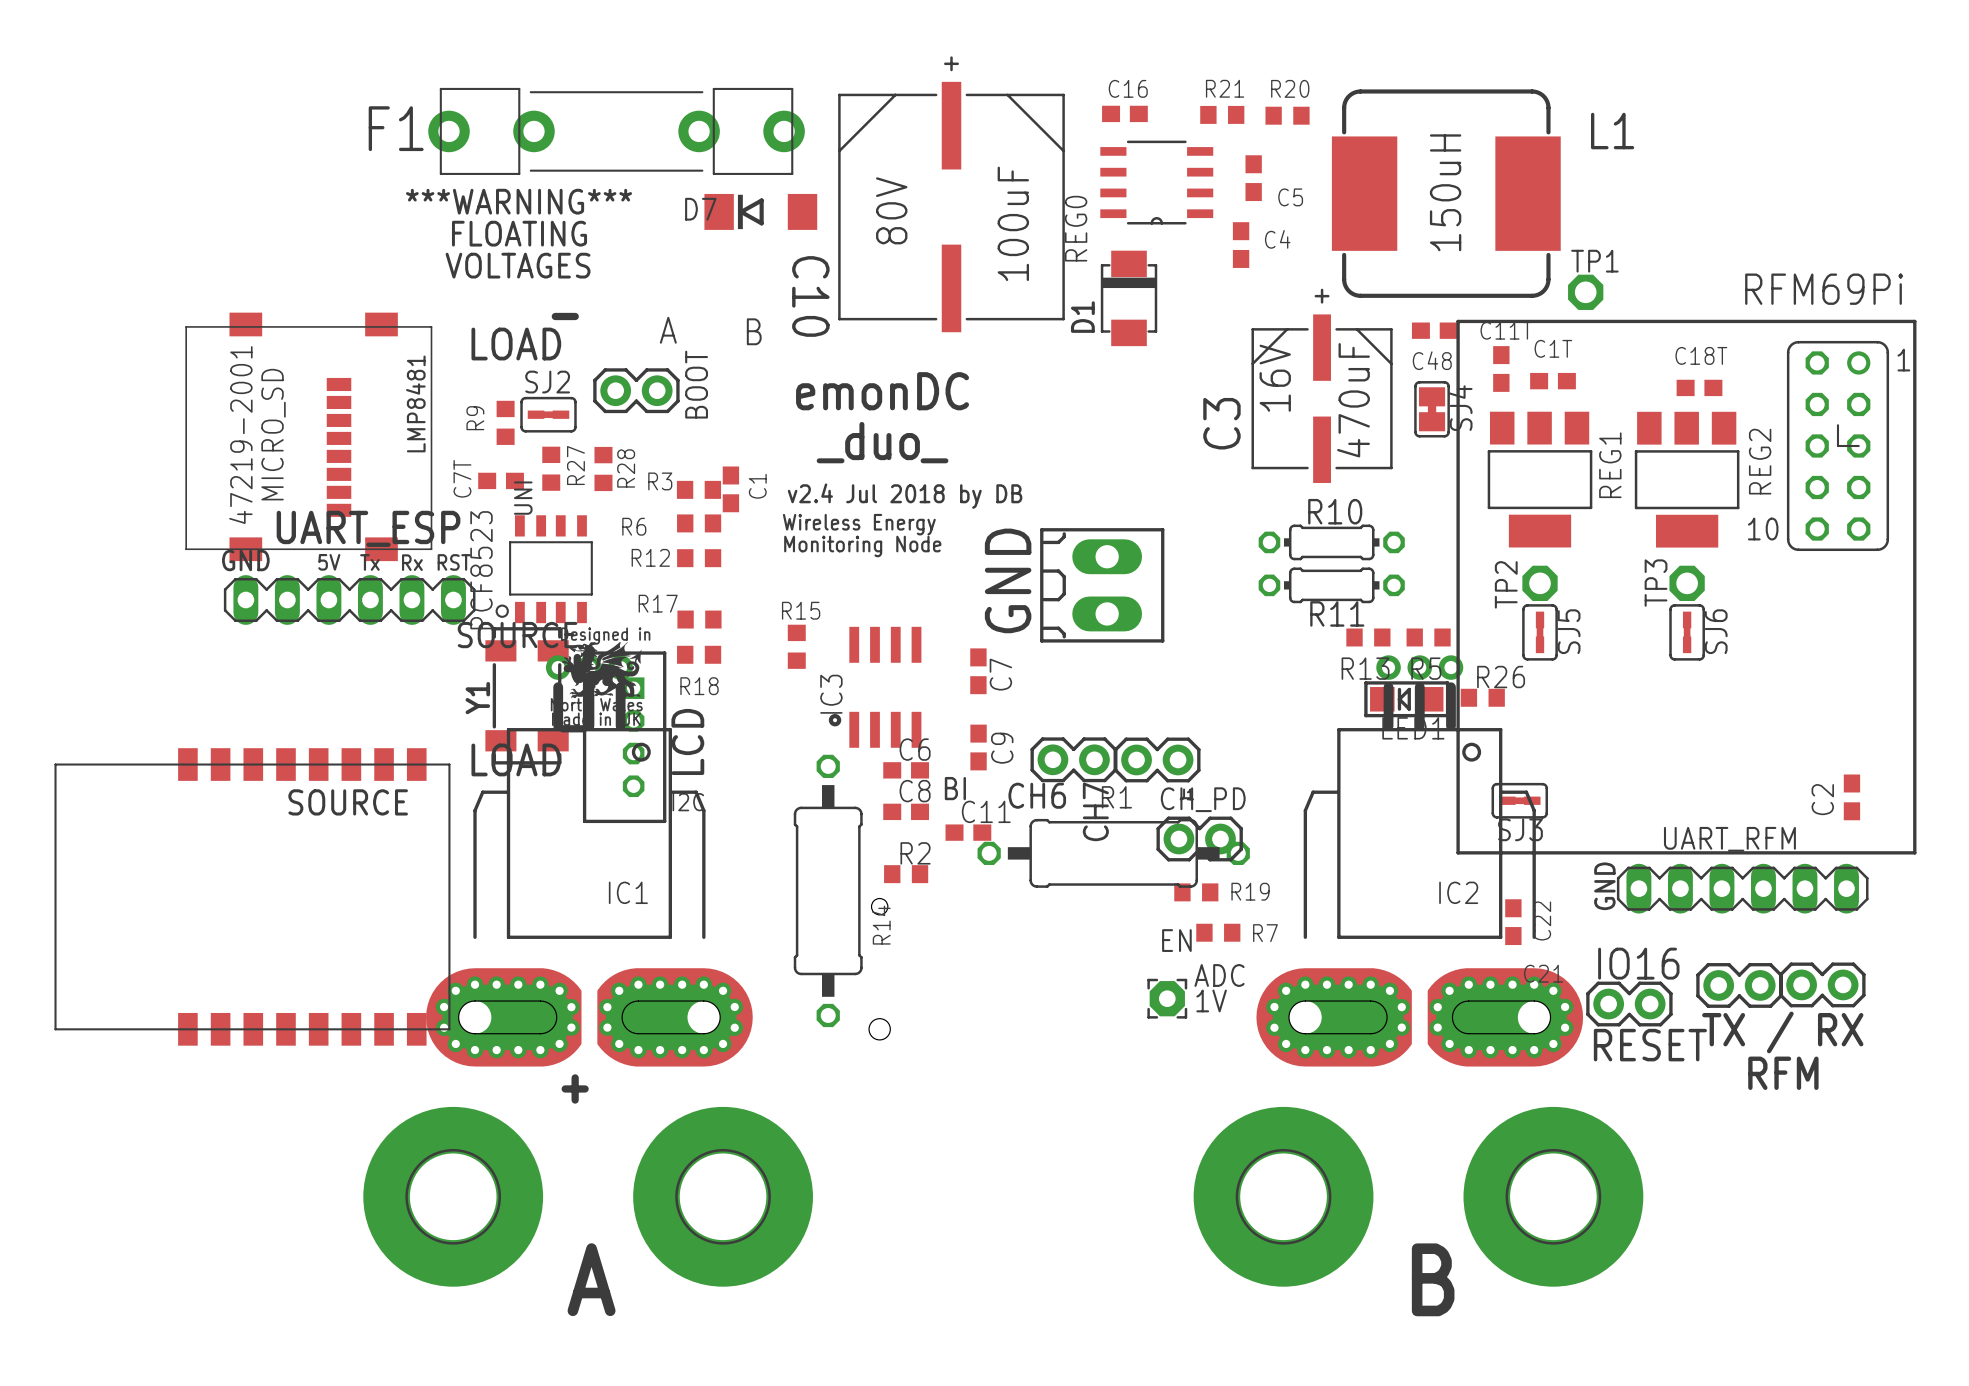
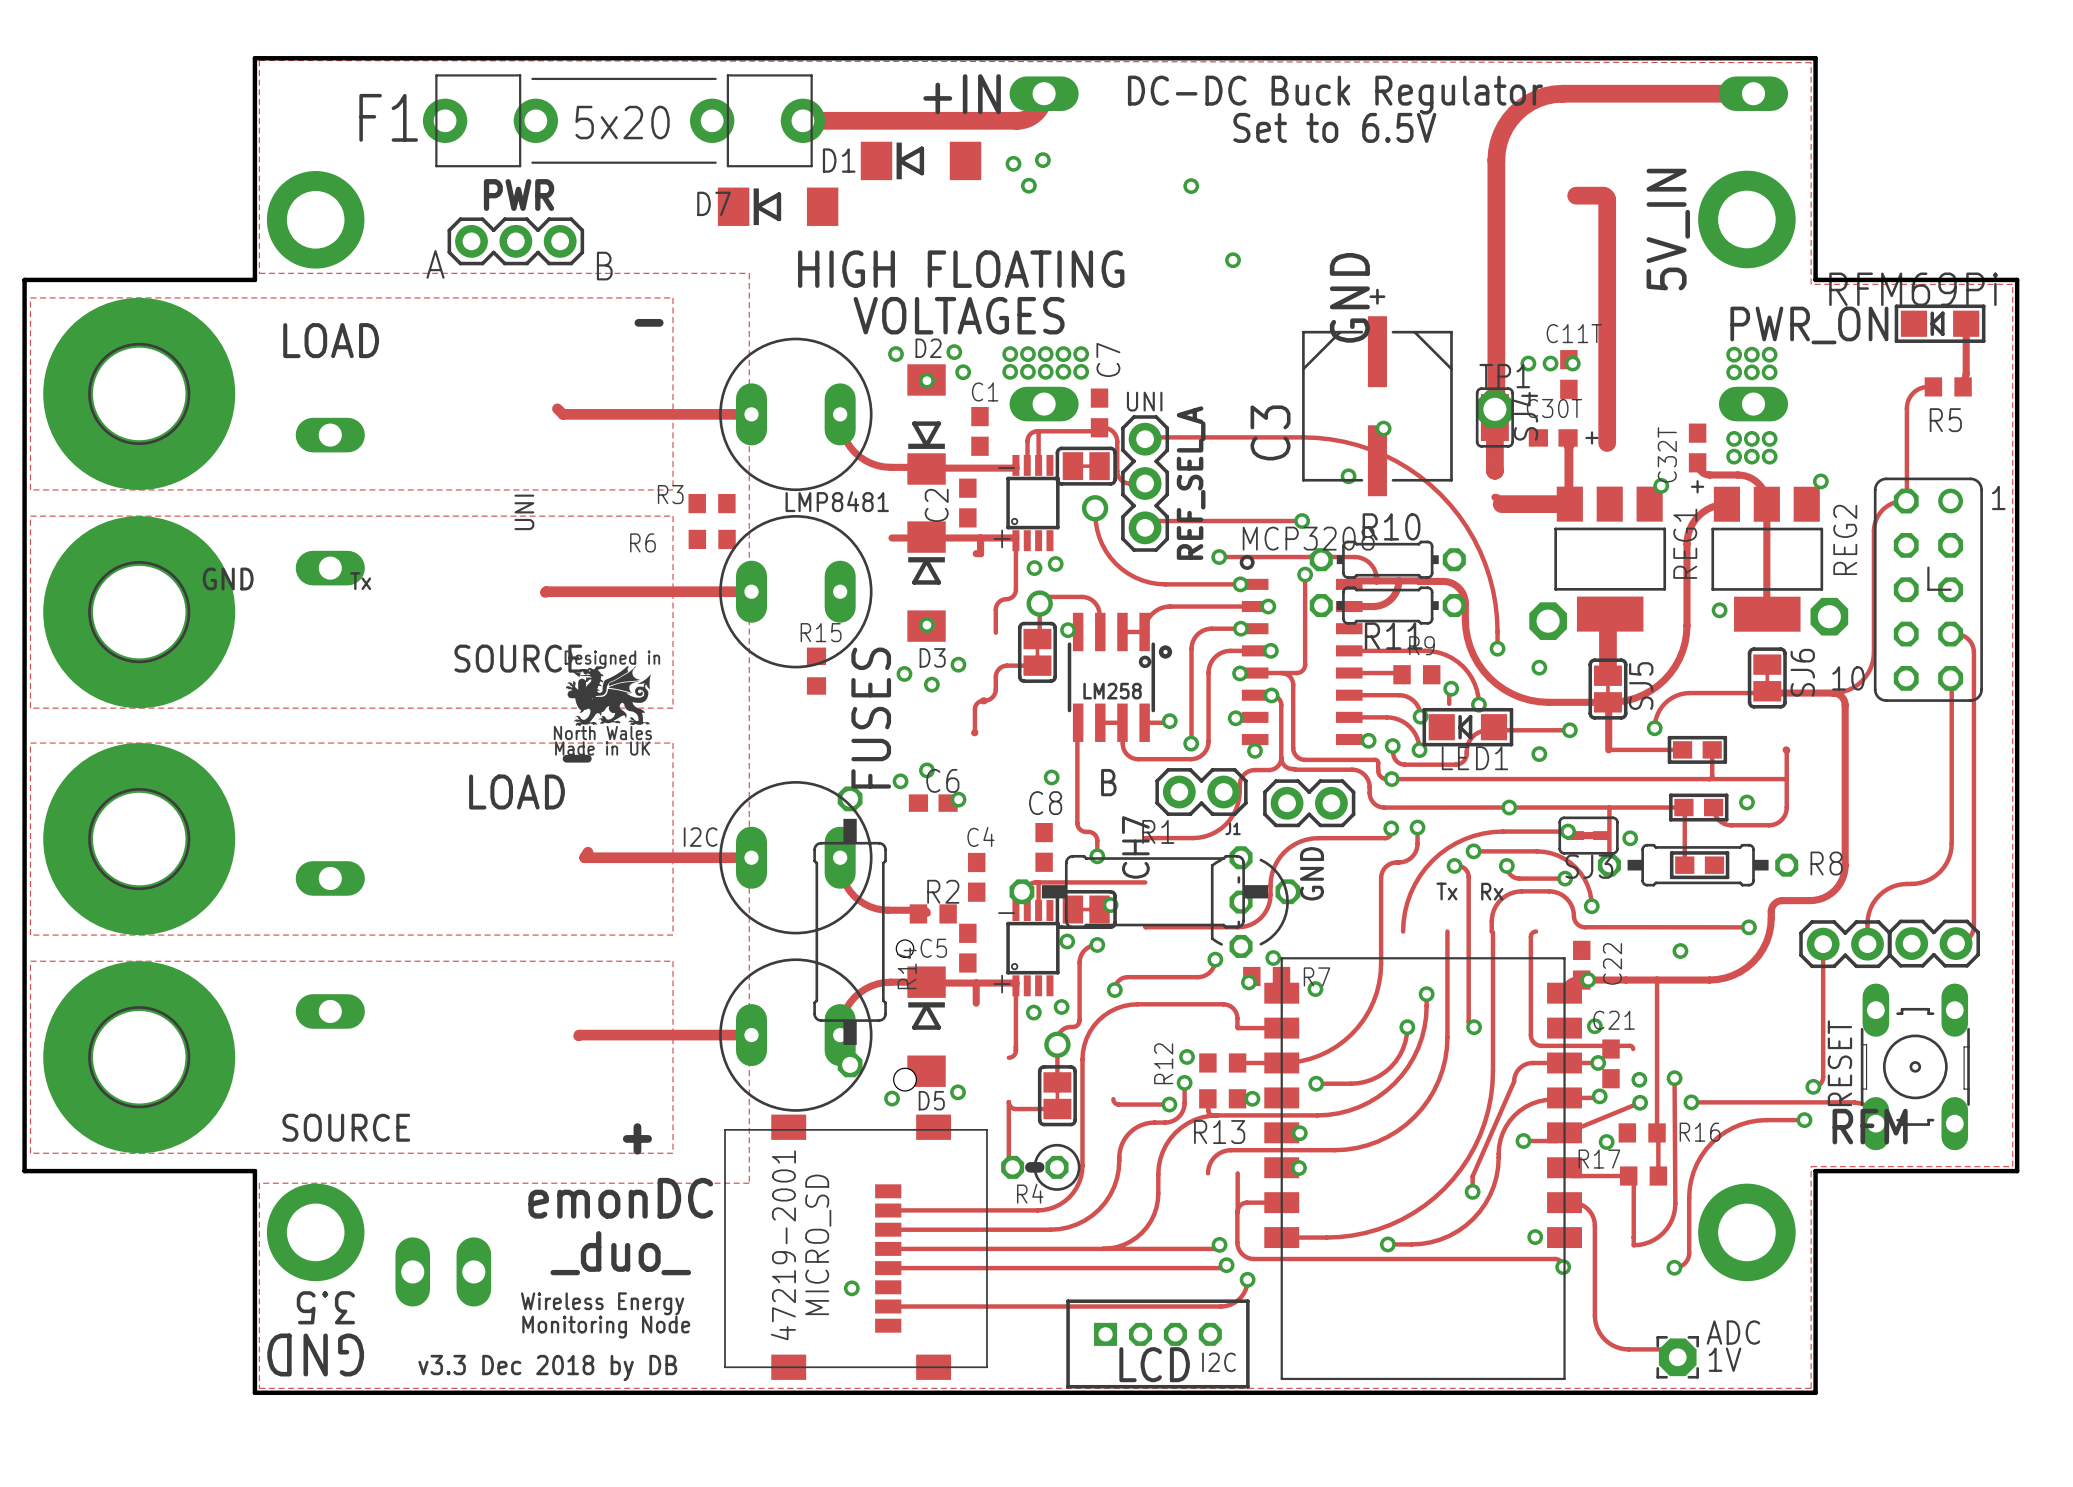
board edge: none -> (254, 58) (254, 279) (24, 279) (24, 1171) (254, 1171) (254, 1392) (1815, 1392) (1815, 1171) (2017, 1171) (2017, 279) (1815, 279) (1815, 58) (254, 58)
zone outline: none -> (259, 60) (259, 273) (749, 273) (749, 1183) (259, 1183) (259, 1388) (1811, 1388) (1811, 1166) (2012, 1166) (2012, 284) (1811, 284) (1811, 62) (259, 60)
text: none -> +IN (962, 94)
track: none -> (1044, 93) (1042, 104) (1036, 112) (1020, 120) (802, 120)
part: none -> (1044, 93)
track: none -> (1753, 93) (1554, 94) (1529, 102) (1510, 119) (1501, 134) (1496, 160) (1494, 470)
part: none -> (1753, 93)
text: none -> DC-DC Buck Regulator (1335, 95)
C16: (1124, 113) -> none
R21: (1222, 114) -> none
R20: (1287, 115) -> none
text: none -> 5x20 (622, 122)
text: none -> Set to 6.5V (1334, 127)
via: none -> (1042, 160)
via: none -> (1013, 163)
C5 position: (1253, 178) -> (967, 948)
REG0: (1156, 182) -> none
via: none -> (1028, 185)
via: none -> (1191, 186)
text: 150uH (1445, 192) -> none
L1: (1446, 193) -> none
C10: (951, 194) -> none
C5 name position: C5 (1290, 197) -> C5 (933, 948)
text: ***WARNING*** (519, 201) -> none
track: none -> (1576, 195) (1603, 195) (1607, 199) (1607, 443)
text: 80V (891, 210) -> none
text: 100uF (1013, 223) -> none
via: none -> (1746, 219)
via: none -> (315, 219)
text: FLOATING (519, 233) -> none
text: none -> 5V_IN (1668, 229)
C4 name position: C4 (1277, 239) -> C4 (980, 836)
PWR: none -> (515, 241)
C4 position: (1241, 245) -> (976, 877)
D1 footprint: [1100, 250, 1158, 347] -> [860, 141, 982, 181]
via: none -> (1233, 260)
text: VOLTAGES (518, 265) -> none
text: none -> HIGH FLOATING (961, 269)
TP1 position: (1585, 292) -> (1494, 409)
zone outline: none -> (30, 297) (30, 489) (673, 489) (673, 297) (30, 297)
text: none -> GND (1349, 297)
text: none -> VOLTAGES (959, 315)
text position: - (565, 316) -> - (649, 322)
D1 name position: D1 (1082, 317) -> D1 (839, 160)
part: none -> (1940, 323)
track: none -> (1966, 323) (1966, 373) (1963, 386)
text: none -> PWR_ON (1809, 325)
text position: A (668, 330) -> A (435, 264)
C48: (1434, 330) -> none
text position: B (754, 331) -> B (604, 266)
text position: LOAD (516, 344) -> LOAD (331, 340)
via: none -> (954, 352)
via: none -> (895, 354)
via: none -> (1010, 354)
via: none -> (1027, 354)
via: none -> (1045, 354)
via: none -> (1063, 354)
via: none -> (1081, 354)
via: none -> (1734, 354)
via: none -> (1751, 354)
via: none -> (1769, 354)
via: none -> (1528, 363)
via: none -> (1550, 363)
via: none -> (1572, 363)
via: none -> (963, 372)
via: none -> (1010, 371)
via: none -> (1027, 371)
via: none -> (1045, 371)
via: none -> (1063, 371)
via: none -> (1081, 371)
via: none -> (1734, 372)
via: none -> (1751, 372)
via: none -> (1769, 372)
via: none -> (926, 380)
text: 16V (1275, 378) -> none
track: none -> (1933, 386) (1917, 389) (1911, 395) (1907, 402) (1906, 500) (1896, 502) (1885, 507) (1877, 516) (1874, 523) (1872, 662) (1868, 672) (1857, 684) (1848, 689) (1833, 693)
C1T: (1553, 381) -> none
part: none -> (139, 393)
C18T: (1699, 387) -> none
BOOT: (636, 390) -> none
text: emonDC (882, 391) -> none
text: none -> UNI (1144, 401)
part: none -> (1044, 404)
part: none -> (1753, 404)
text: 470uF (1353, 400) -> none
track: none -> (557, 408) (563, 414) (751, 414)
text: LMP8481 (415, 403) -> none
part: none -> (795, 414)
track: none -> (840, 414) (841, 429) (846, 442) (854, 452) (865, 460) (884, 466) (926, 468)
SJ2: (548, 414) -> none
D2: none -> (926, 424)
via: none -> (1383, 428)
R9 rotation: 0° (505, 422) -> 90° clockwise (1416, 674)
R9 position: (505, 422) -> (1416, 674)
track: none -> (1037, 431) (1096, 431) (1099, 427) (1108, 428) (1116, 438) (1118, 477) (1126, 483) (1145, 483)
track: none -> (1037, 431) (1031, 433) (1027, 438) (1027, 465)
track: none -> (1037, 431) (1038, 465)
part: none -> (330, 435)
C30T: none -> (1563, 437)
track: none -> (1568, 437) (1570, 442) (1569, 504) (1501, 504) (1499, 499) (1494, 497)
track: none -> (1145, 439) (1146, 437) (1302, 437) (1330, 439) (1370, 449) (1408, 468) (1430, 484) (1450, 504) (1466, 526) (1479, 551) (1489, 577) (1495, 604) (1497, 648)
via: none -> (1734, 438)
via: none -> (1751, 438)
via: none -> (1769, 438)
part: (308, 436) -> none
text: _duo_ (882, 442) -> none
via: none -> (1734, 456)
via: none -> (1751, 456)
via: none -> (1769, 456)
C32T: none -> (1697, 458)
track: none -> (1697, 462) (1700, 470) (1706, 474) (1737, 475) (1749, 477) (1758, 483) (1764, 492) (1766, 503) (1766, 613) (1769, 616)
track: none -> (1015, 465) (1015, 468) (926, 468)
part: none -> (1086, 466)
via: none -> (1348, 476)
R27: (551, 468) -> none
R28: (603, 468) -> none
via: none -> (1820, 481)
REF_SEL_A: none -> (1145, 483)
via: none -> (1661, 485)
REG1 position: (1540, 479) -> (1610, 559)
REG2 position: (1687, 479) -> (1767, 559)
C7T: (501, 480) -> none
C1 name rotation: 0° (757, 486) -> 90° clockwise (985, 391)
C1 name position: C1 (757, 486) -> C1 (985, 391)
text: none -> LMP8481 (837, 501)
C1 position: (730, 489) -> (979, 431)
part: none -> (1032, 503)
track: none -> (1726, 504) (1711, 507) (1702, 512) (1695, 519) (1688, 533) (1686, 634) (1679, 658) (1670, 673) (1658, 685) (1643, 694) (1627, 700) (1610, 702) (1539, 701) (1521, 697) (1504, 689) (1483, 670) (1473, 655) (1465, 628) (1464, 597) (1460, 590) (1451, 583) (1352, 580) (1349, 584)
track: none -> (1095, 508) (1097, 529) (1106, 551) (1115, 563) (1135, 577) (1157, 583) (1255, 584)
part: none -> (1095, 508)
text: v2.4 Jul 2018 by DB (905, 496) -> none
zone outline: none -> (30, 516) (30, 708) (673, 708) (673, 516) (30, 516)
track: none -> (1302, 521) (1151, 521) (1147, 523) (1145, 527)
via: none -> (1302, 521)
track: none -> (891, 538) (1015, 537)
track: none -> (980, 537) (980, 553) (976, 553)
text: Wireless Energy (859, 524) -> none
track: none -> (1015, 540) (1015, 592) (1012, 597) (1001, 600) (996, 605) (995, 632)
track: none -> (1219, 557) (1357, 557) (1365, 560) (1372, 565) (1376, 580)
via: none -> (1219, 557)
text: Monitoring Node (862, 546) -> none
via: none -> (1055, 563)
part: none -> (330, 568)
via: none -> (1034, 568)
track: none -> (1305, 574) (1303, 668) (1297, 672) (1240, 673)
via: none -> (1305, 574)
R12 name rotation: 0° (650, 557) -> 90° counterclockwise (1163, 1063)
R12 position: (699, 558) -> (1222, 1062)
text: 5V (329, 562) -> none
text: Rx (412, 562) -> none
text: RST (454, 562) -> none
D3: none -> (926, 581)
track: none -> (1398, 580) (1395, 593) (1385, 603) (1376, 606) (1349, 606)
via: none -> (1240, 584)
PCF8523: (544, 569) -> none
part: none -> (1928, 589)
track: none -> (751, 591) (545, 592)
part: none -> (795, 591)
part: none -> (1039, 603)
TP2: (1540, 583) -> none
TP3: (1687, 583) -> none
GND: (1102, 585) -> none
track: none -> (1268, 606) (1166, 606) (1152, 613) (1146, 622) (1144, 631) (1122, 631)
via: none -> (1268, 606)
part: (1686, 587) -> none
via: none -> (1719, 610)
part: none -> (139, 612)
part: none -> (1829, 616)
track: none -> (1606, 619) (1607, 675) (1607, 675) (1607, 621) (1606, 619)
part: UART_ESP (349, 599) -> none
part: none -> (1548, 621)
via: none -> (926, 625)
SJ5 footprint: [1522, 604, 1558, 661] -> [1588, 658, 1628, 720]
SJ6 footprint: [1669, 604, 1705, 661] -> [1747, 647, 1787, 709]
via: none -> (1240, 628)
track: none -> (1255, 628) (1209, 628) (1201, 631) (1194, 638) (1191, 649) (1191, 743)
via: none -> (1068, 630)
track: none -> (1100, 631) (1098, 610) (1090, 599) (1081, 596) (1045, 596) (1039, 602) (1039, 636) (1037, 639)
track: none -> (1950, 634) (1960, 634) (1966, 637) (1972, 645) (1973, 652) (1973, 925) (1968, 938) (1956, 943)
R17 position: (699, 619) -> (1643, 1176)
via: none -> (1497, 648)
track: none -> (1270, 650) (1227, 651) (1219, 653) (1213, 659) (1208, 672) (1208, 743) (1204, 752) (1197, 757) (1132, 758) (1127, 754) (1123, 747) (1122, 722) (1100, 722)
via: none -> (1270, 650)
MCP3208: none -> (1301, 650)
track: none -> (1349, 650) (1425, 650) (1445, 654) (1457, 661) (1467, 671) (1477, 690) (1478, 704)
part: none -> (1037, 652)
R13 position: (1368, 637) -> (1222, 1098)
R5 position: (1428, 637) -> (1948, 386)
via: none -> (958, 664)
via: none -> (1539, 667)
track: none -> (1031, 671) (1035, 670) (1037, 665) (1005, 665) (999, 668) (995, 675) (994, 695) (988, 699) (979, 701) (975, 706) (974, 732)
via: none -> (1240, 673)
track: none -> (1281, 673) (1289, 676) (1293, 683) (1293, 747) (1296, 756) (1305, 759) (1375, 759) (1378, 762) (1378, 773) (1384, 778) (1786, 779)
track: none -> (1349, 673) (1400, 673) (1402, 674)
via: none -> (904, 673)
LM258: none -> (1111, 677)
track: none -> (1950, 678) (1950, 853) (1943, 868) (1931, 878) (1916, 883) (1896, 885) (1879, 895) (1868, 913) (1867, 944)
R18: (699, 654) -> none
via: none -> (931, 684)
track: none -> (1451, 688) (1449, 690) (1449, 703)
via: none -> (1451, 688)
track: none -> (1767, 691) (1769, 693) (1833, 693)
track: none -> (1774, 693) (1680, 694) (1668, 700) (1661, 706) (1655, 719) (1654, 728)
track: none -> (1833, 693) (1841, 696) (1845, 705) (1845, 865) (1842, 878) (1834, 890) (1819, 899) (1780, 900) (1775, 902) (1771, 908) (1769, 934) (1762, 949) (1753, 961) (1733, 975) (1709, 980) (1575, 980) (1568, 983) (1564, 993)
track: none -> (1255, 695) (1274, 695) (1280, 701) (1281, 757)
via: none -> (1271, 695)
track: none -> (1349, 695) (1404, 695) (1416, 703) (1420, 716)
C7 position: (978, 671) -> (1099, 412)
C7 name position: C7 (1000, 674) -> C7 (1108, 359)
track: none -> (1607, 702) (1608, 749) (1682, 749)
via: none -> (1478, 704)
IC3: (885, 687) -> none
via: none -> (1420, 716)
text: none -> FUSES (871, 718)
via: none -> (1235, 718)
track: none -> (1349, 717) (1386, 717) (1399, 719) (1406, 724) (1415, 733) (1419, 750)
track: none -> (1169, 721) (1169, 722) (1144, 722)
via: none -> (1169, 721)
Y1: (527, 695) -> none
track: none -> (1078, 722) (1077, 824) (1081, 830) (1091, 832) (1096, 836) (1097, 856)
R26: (1482, 697) -> none
via: none -> (1654, 728)
track: none -> (1569, 730) (1482, 731) (1471, 738) (1465, 759) (1457, 764) (1401, 764) (1394, 758) (1392, 746)
via: none -> (1569, 730)
via: none -> (1368, 740)
zone outline: none -> (30, 743) (30, 935) (673, 935) (673, 743) (30, 743)
via: none -> (1191, 743)
via: none -> (1392, 746)
drawing position: (835, 720) -> (1165, 651)
via: none -> (1419, 750)
part: none -> (1697, 749)
track: none -> (1712, 749) (1712, 776) (1709, 779)
track: none -> (1786, 749) (1786, 809) (1779, 821) (1769, 825) (1726, 824) (1717, 818) (1713, 807)
via: none -> (1254, 750)
via: none -> (1539, 754)
track: none -> (1281, 757) (1285, 766) (1295, 769) (1358, 771) (1368, 780) (1371, 800) (1382, 807) (1684, 807) (1684, 865)
track: none -> (1281, 757) (1278, 765) (1273, 769) (1252, 770) (1244, 774) (1240, 781) (1236, 809) (1230, 819) (1216, 831) (1198, 837) (1145, 838)
part: (624, 737) -> none
via: none -> (926, 770)
text: LCD (687, 741) -> none
via: none -> (1051, 777)
C9: (978, 747) -> none
via: none -> (1391, 779)
via: none -> (900, 781)
text: none -> B (1108, 782)
part position: (1073, 759) -> (1309, 803)
via: none -> (958, 799)
via: none -> (1746, 802)
via: none -> (1509, 807)
track: none -> (1609, 807) (1609, 865)
part: none -> (1698, 807)
text: BI (955, 788) -> none
track: none -> (1417, 827) (1417, 846) (1413, 855) (1406, 861) (1388, 864) (1381, 874) (1379, 983) (1373, 1001) (1358, 1026) (1336, 1046) (1310, 1058) (1291, 1062) (1237, 1063)
via: none -> (1417, 827)
track: none -> (1391, 828) (1390, 835) (1386, 838) (1311, 838) (1299, 841) (1289, 848) (1280, 856) (1274, 867) (1270, 879) (1270, 899) (1266, 911) (1261, 917) (1250, 924) (1238, 927) (1145, 926)
via: none -> (1391, 828)
text: CH6 (1037, 795) -> none
track: none -> (1568, 831) (1493, 832) (1464, 839) (1447, 848) (1432, 860) (1414, 884) (1405, 912) (1403, 931)
via: none -> (1568, 831)
C2 position: (1851, 797) -> (967, 503)
text position: SOURCE (348, 802) -> SOURCE (346, 1127)
via: none -> (1630, 838)
part: none -> (139, 839)
C8 rotation: 0° (906, 811) -> 90° clockwise (1044, 847)
C8 position: (906, 811) -> (1044, 847)
track: none -> (1473, 851) (1536, 851) (1557, 855) (1570, 862) (1580, 872) (1589, 892) (1591, 906)
via: none -> (1473, 851)
track: none -> (587, 852) (584, 857) (751, 857)
via: none -> (1097, 856)
part: none -> (795, 857)
track: none -> (840, 857) (841, 874) (846, 886) (854, 896) (864, 903) (881, 909) (924, 910) (927, 913)
R8: none -> (1698, 865)
part: none -> (1699, 865)
track: none -> (1454, 865) (1464, 868) (1468, 875) (1468, 1021) (1470, 1025) (1474, 1027)
via: none -> (1454, 865)
track: none -> (1506, 865) (1509, 873) (1516, 878) (1565, 878)
via: none -> (1506, 865)
C11: (968, 832) -> none
text: none -> GND (1311, 873)
CH_PD: (1199, 838) -> none
part: none -> (330, 878)
via: none -> (1565, 878)
track: none -> (1038, 882) (1038, 910)
track: none -> (1145, 882) (1033, 882) (1027, 888) (1027, 910)
text: none -> Tx (1446, 891)
text: none -> Rx (1492, 891)
IC1: (589, 860) -> none
IC2: (1419, 860) -> none
part: none -> (1249, 902)
via: none -> (1110, 905)
via: none -> (1591, 906)
part: none -> (1086, 909)
text: GND (1604, 886) -> none
track: none -> (1748, 927) (1583, 927) (1575, 921) (1568, 901) (1558, 893) (1521, 891) (1506, 895) (1497, 903) (1492, 917) (1492, 1071) (1490, 1097) (1480, 1134) (1468, 1158) (1453, 1179) (1434, 1197) (1413, 1213) (1390, 1224) (1365, 1232) (1339, 1237) (1281, 1237)
via: none -> (1748, 927)
UART_RFM: (1742, 888) -> none
track: none -> (1447, 931) (1447, 1037) (1445, 1059) (1434, 1090) (1414, 1117) (1387, 1136) (1356, 1148) (1334, 1150) (1225, 1150) (1212, 1159) (1208, 1173)
track: none -> (1536, 931) (1532, 933) (1530, 936) (1530, 1035) (1533, 1041) (1540, 1045) (1630, 1045) (1633, 1049)
R19: (1196, 892) -> none
part: (252, 896) -> none
via: none -> (1067, 941)
part: none -> (1933, 943)
track: none -> (1823, 944) (1823, 1078) (1820, 1083) (1813, 1086)
part: none -> (1845, 944)
track: none -> (1097, 944) (1086, 948) (1080, 958) (1079, 1021) (1076, 1026) (1064, 1028) (1058, 1035) (1057, 1082)
via: none -> (1097, 944)
part: none -> (1032, 948)
via: none -> (1680, 951)
via: none -> (1273, 958)
track: none -> (1215, 959) (1211, 970) (1202, 976) (1125, 977) (1118, 980) (1114, 990)
via: none -> (1215, 959)
zone outline: none -> (30, 961) (673, 961) (673, 1153) (30, 1153) (30, 961)
via: none -> (1588, 980)
track: none -> (1657, 980) (1658, 1176)
track: none -> (926, 983) (1015, 983) (1015, 1051)
track: none -> (926, 983) (884, 982) (865, 988) (854, 996) (846, 1007) (841, 1019) (840, 1035)
track: none -> (976, 983) (976, 1003)
via: none -> (1248, 982)
text: EN (1176, 940) -> none
via: none -> (1315, 989)
via: none -> (1114, 990)
track: none -> (1426, 994) (1424, 1027) (1413, 1057) (1394, 1083) (1368, 1102) (1348, 1110) (1327, 1114) (1213, 1115) (1208, 1111) (1207, 1098)
via: none -> (1426, 994)
via: none -> (1061, 1006)
part: none -> (330, 1011)
via: none -> (1033, 1012)
D5: none -> (926, 1026)
via: none -> (1594, 1026)
track: none -> (1407, 1027) (1405, 1041) (1399, 1055) (1390, 1067) (1379, 1076) (1358, 1083) (1316, 1083)
via: none -> (1407, 1027)
via: none -> (1474, 1027)
track: none -> (1281, 1028) (1238, 1028) (1235, 1011) (1225, 1004) (1137, 1004) (1116, 1008) (1098, 1020) (1089, 1031) (1084, 1045) (1082, 1059) (1082, 1171) (1076, 1188) (1069, 1197) (1060, 1204) (1043, 1210) (888, 1210)
part: (1822, 984) -> none
part: (1739, 985) -> none
track: none -> (751, 1035) (578, 1035)
part: none -> (795, 1035)
part: none -> (1057, 1044)
ADC: (1167, 998) -> none
text: 1V (1211, 1000) -> none
track: none -> (1015, 1050) (1013, 1055) (1008, 1057)
IO16: (1629, 1004) -> none
part: none -> (139, 1057)
via: none -> (1187, 1056)
track: none -> (1598, 1062) (1530, 1063) (1519, 1068) (1472, 1176) (1472, 1191)
via: none -> (1598, 1062)
RESET: none -> (1915, 1066)
track: none -> (1674, 1078) (1674, 1209) (1669, 1224) (1659, 1236) (1649, 1242) (1633, 1245) (1633, 1181) (1628, 1176) (1571, 1175) (1566, 1172) (1564, 1167)
via: none -> (1674, 1078)
via: none -> (1639, 1079)
track: none -> (1184, 1082) (1184, 1105) (1178, 1116) (1170, 1121) (1141, 1125) (1126, 1136) (1120, 1148) (1116, 1178) (1110, 1195) (1099, 1209) (1084, 1220) (1068, 1227) (1050, 1229) (888, 1229)
via: none -> (1184, 1082)
text: TX / RX (1782, 1032) -> none
via: none -> (1316, 1083)
via: none -> (1813, 1086)
via: none -> (957, 1092)
part: none -> (1057, 1095)
track: none -> (1599, 1096) (1545, 1100) (1532, 1103) (1519, 1110) (1509, 1120) (1502, 1132) (1493, 1186) (1485, 1203) (1473, 1218) (1457, 1231) (1440, 1239) (1421, 1243) (1387, 1244)
via: none -> (1599, 1096)
text: RESET (1650, 1045) -> none
via: none -> (892, 1098)
track: none -> (1113, 1099) (1118, 1104) (1169, 1104)
via: none -> (1252, 1098)
track: none -> (1640, 1102) (1576, 1128) (1568, 1127) (1562, 1137) (1558, 1140) (1523, 1140)
via: none -> (1640, 1102)
track: none -> (1691, 1102) (1854, 1102) (1869, 1108) (1874, 1115) (1875, 1123)
via: none -> (1691, 1102)
via: none -> (1169, 1104)
track: none -> (1057, 1109) (1014, 1108) (1010, 1106) (1008, 1102) (1008, 1163) (1012, 1167)
track: none -> (1217, 1115) (1201, 1117) (1187, 1123) (1170, 1138) (1160, 1159) (1157, 1200) (1150, 1221) (1142, 1232) (1130, 1241) (1117, 1247) (1102, 1248)
track: none -> (1804, 1120) (1749, 1122) (1725, 1131) (1711, 1142) (1701, 1156) (1691, 1180) (1688, 1256) (1681, 1265) (1673, 1266)
via: none -> (1804, 1120)
via: none -> (1299, 1133)
R16: none -> (1642, 1132)
via: none -> (1523, 1140)
via: none -> (1606, 1142)
text position: + (575, 1088) -> + (637, 1138)
R4: none -> (1040, 1167)
via: none -> (1298, 1168)
part: none -> (1423, 1168)
track: none -> (1237, 1173) (1237, 1211)
via: none -> (1472, 1191)
text: none -> emonDC (620, 1198)
track: none -> (1281, 1202) (1244, 1202) (1239, 1206) (1237, 1211)
track: none -> (1564, 1202) (1583, 1205) (1590, 1211) (1594, 1219) (1595, 1320) (1601, 1336) (1608, 1342) (1619, 1348) (1670, 1349) (1676, 1352) (1677, 1357)
track: none -> (1237, 1211) (1237, 1246) (1242, 1254) (1251, 1258) (1555, 1259) (1560, 1261) (1563, 1267)
via: none -> (315, 1232)
via: none -> (1746, 1232)
via: none -> (1535, 1237)
via: none -> (1387, 1244)
track: none -> (1219, 1244) (1215, 1248) (888, 1248)
via: none -> (1219, 1244)
part: none -> (855, 1247)
text: none -> _duo_ (620, 1253)
part: (453, 1196) -> none
part: (723, 1196) -> none
part: (1283, 1196) -> none
part: (1553, 1196) -> none
track: none -> (1226, 1265) (1223, 1268) (888, 1268)
via: none -> (1226, 1265)
via: none -> (1563, 1267)
via: none -> (1674, 1267)
part: none -> (412, 1271)
part: none -> (473, 1271)
track: none -> (1247, 1279) (1245, 1289) (1239, 1298) (1224, 1306) (888, 1306)
via: none -> (1247, 1279)
via: none -> (851, 1288)
text: none -> Wireless Energy (602, 1303)
text: none -> 3.5 (325, 1307)
text: none -> Monitoring Node (606, 1327)
part: none -> (1157, 1343)
text: A (591, 1279) -> none
text: B (1433, 1279) -> none
text: none -> GND (315, 1354)
ADC: none -> (1677, 1357)
text: none -> 1V (1725, 1359)
text: none -> I2C (1218, 1362)
text: none -> LCD (1154, 1364)
text: none -> v3.3 Dec 2018 by DB (547, 1367)

